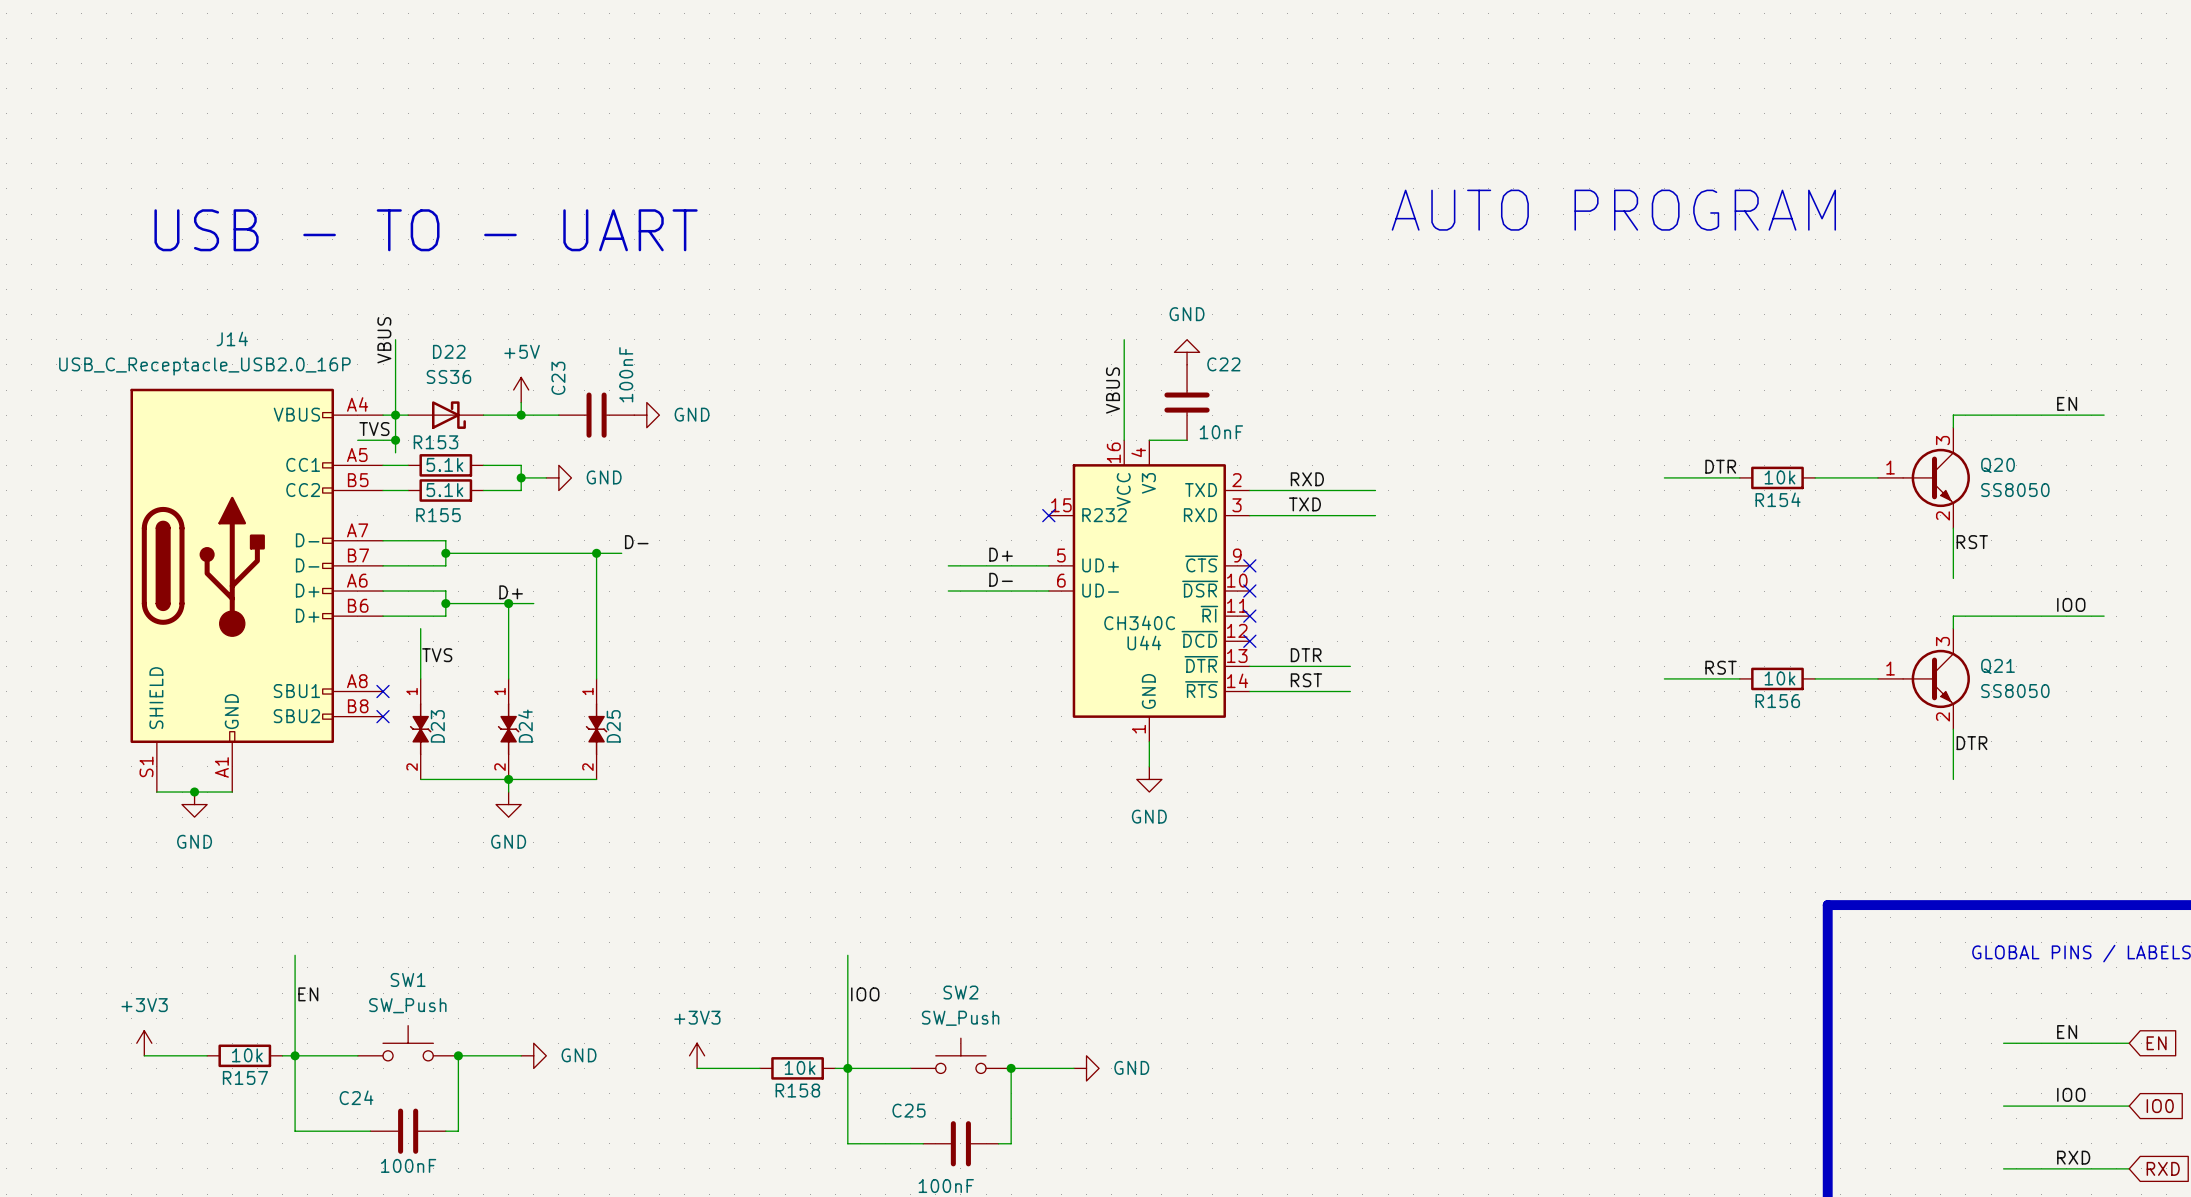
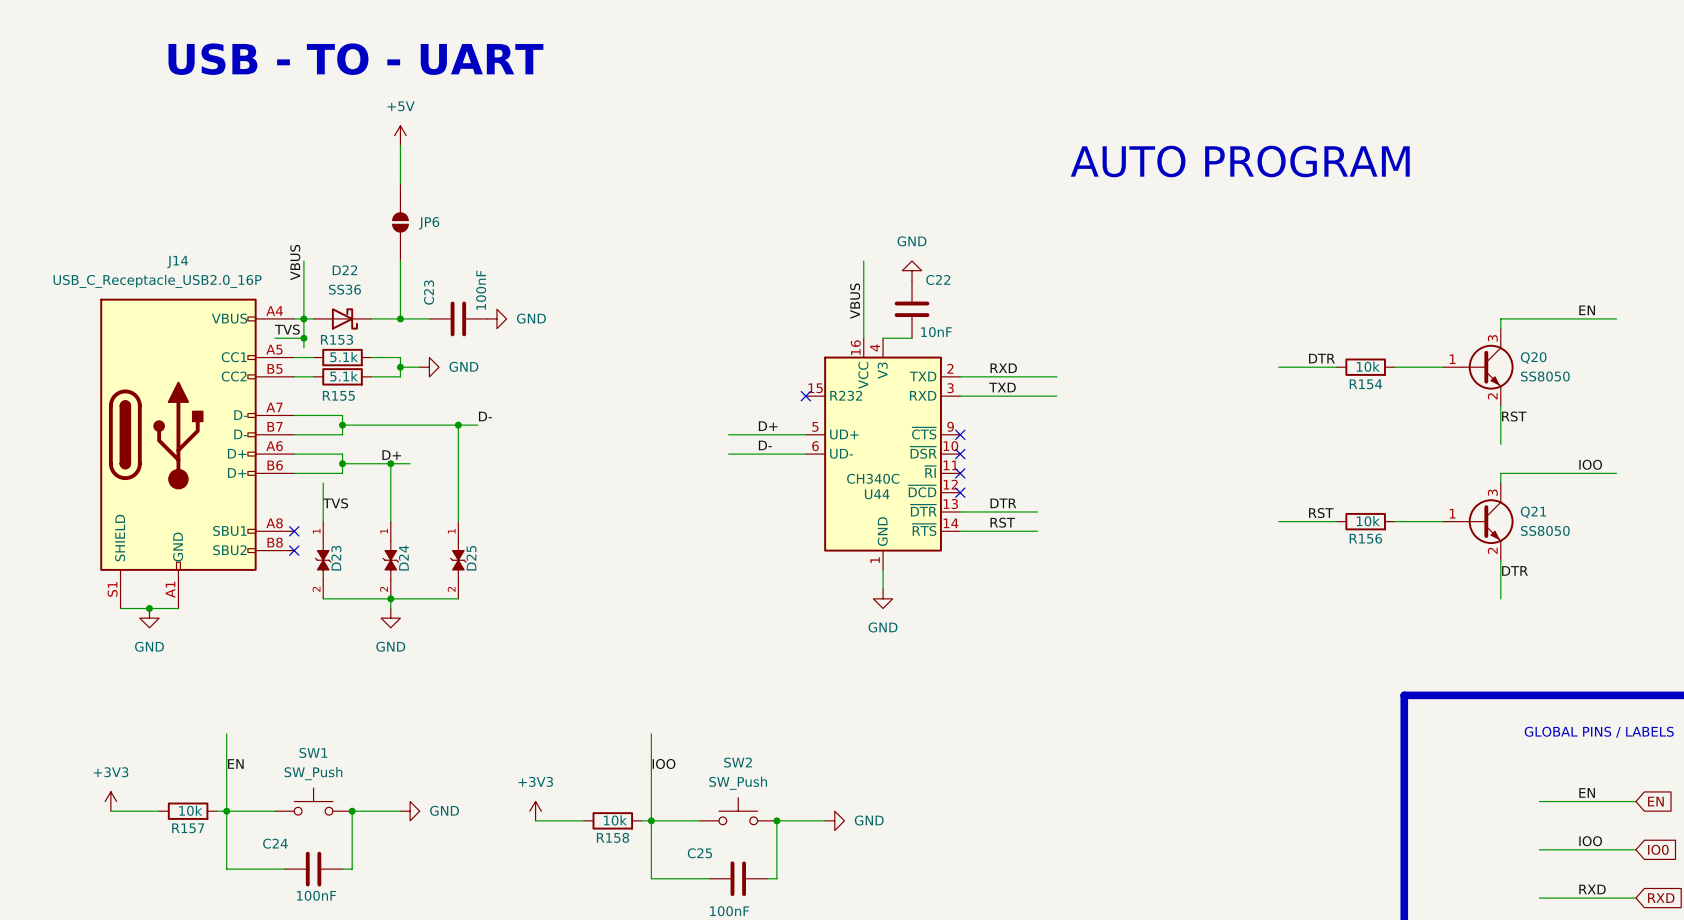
wire: none -> (400, 145) (400, 183)
text position: USB - TO - UART (426, 230) -> USB - TO - UART (355, 59)
JP6: none -> (400, 222)
wire: none -> (400, 261) (400, 309)
power symbol position: +5V (521, 390) -> +5V (400, 135)

